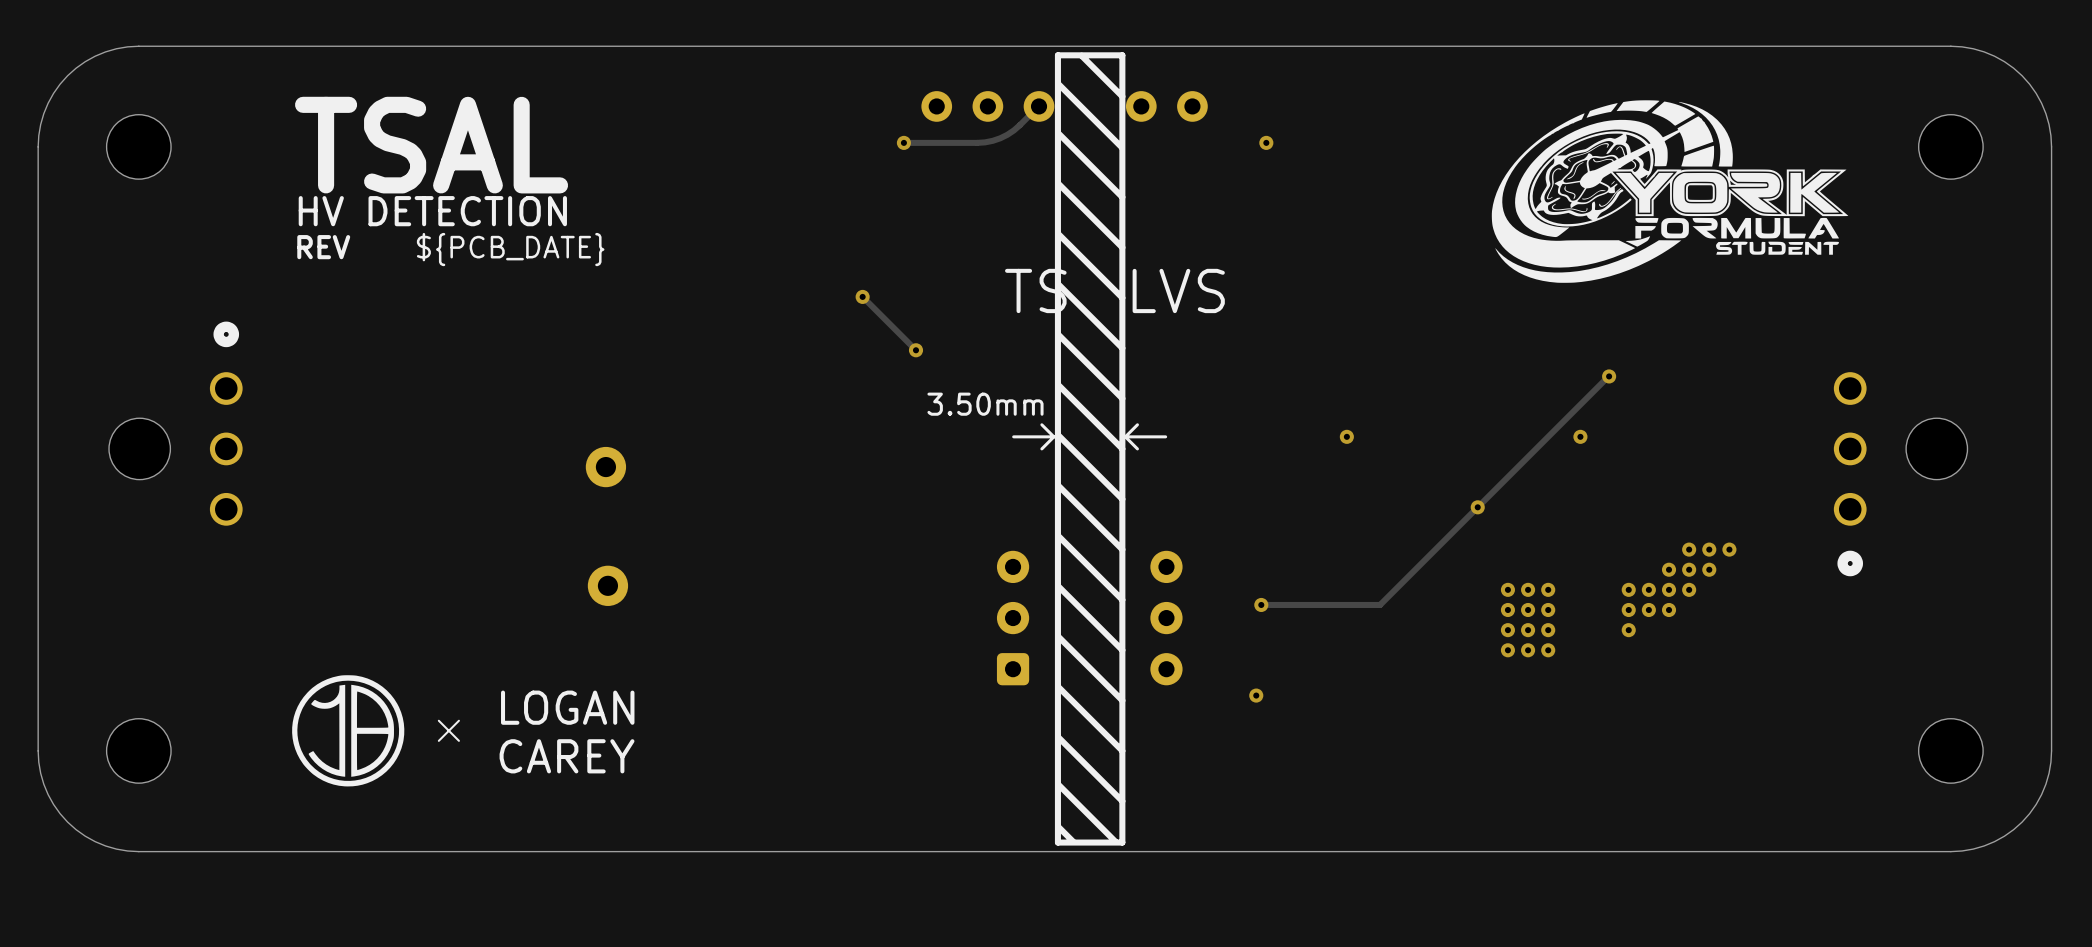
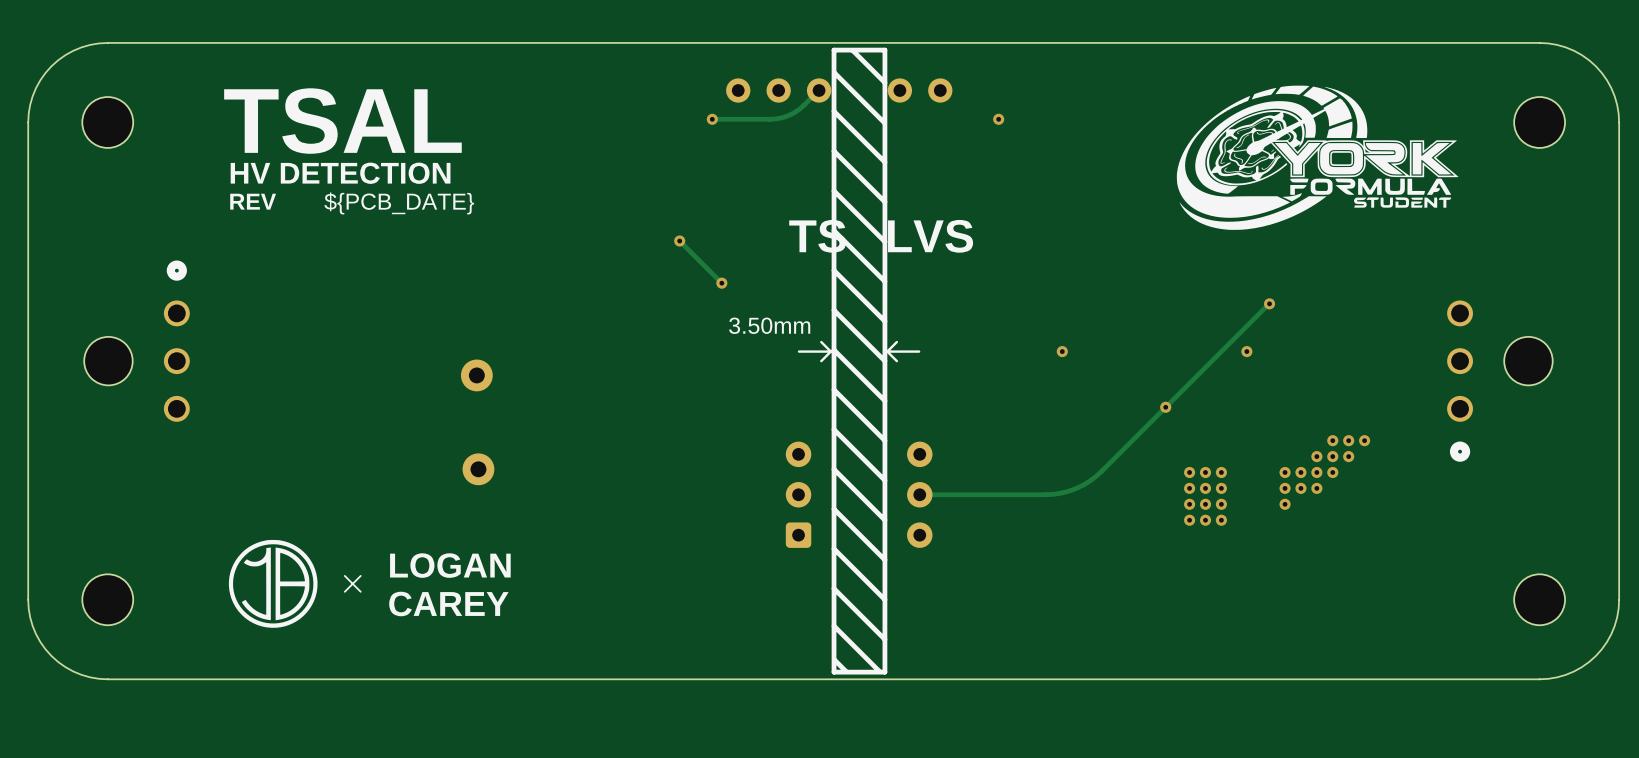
track: (1396, 588) (1380, 604) (1261, 604) -> (1101, 471) (1082, 485) (1068, 491) (1053, 494) (919, 494)
via: (1261, 604) -> none
via: (1256, 695) -> none

